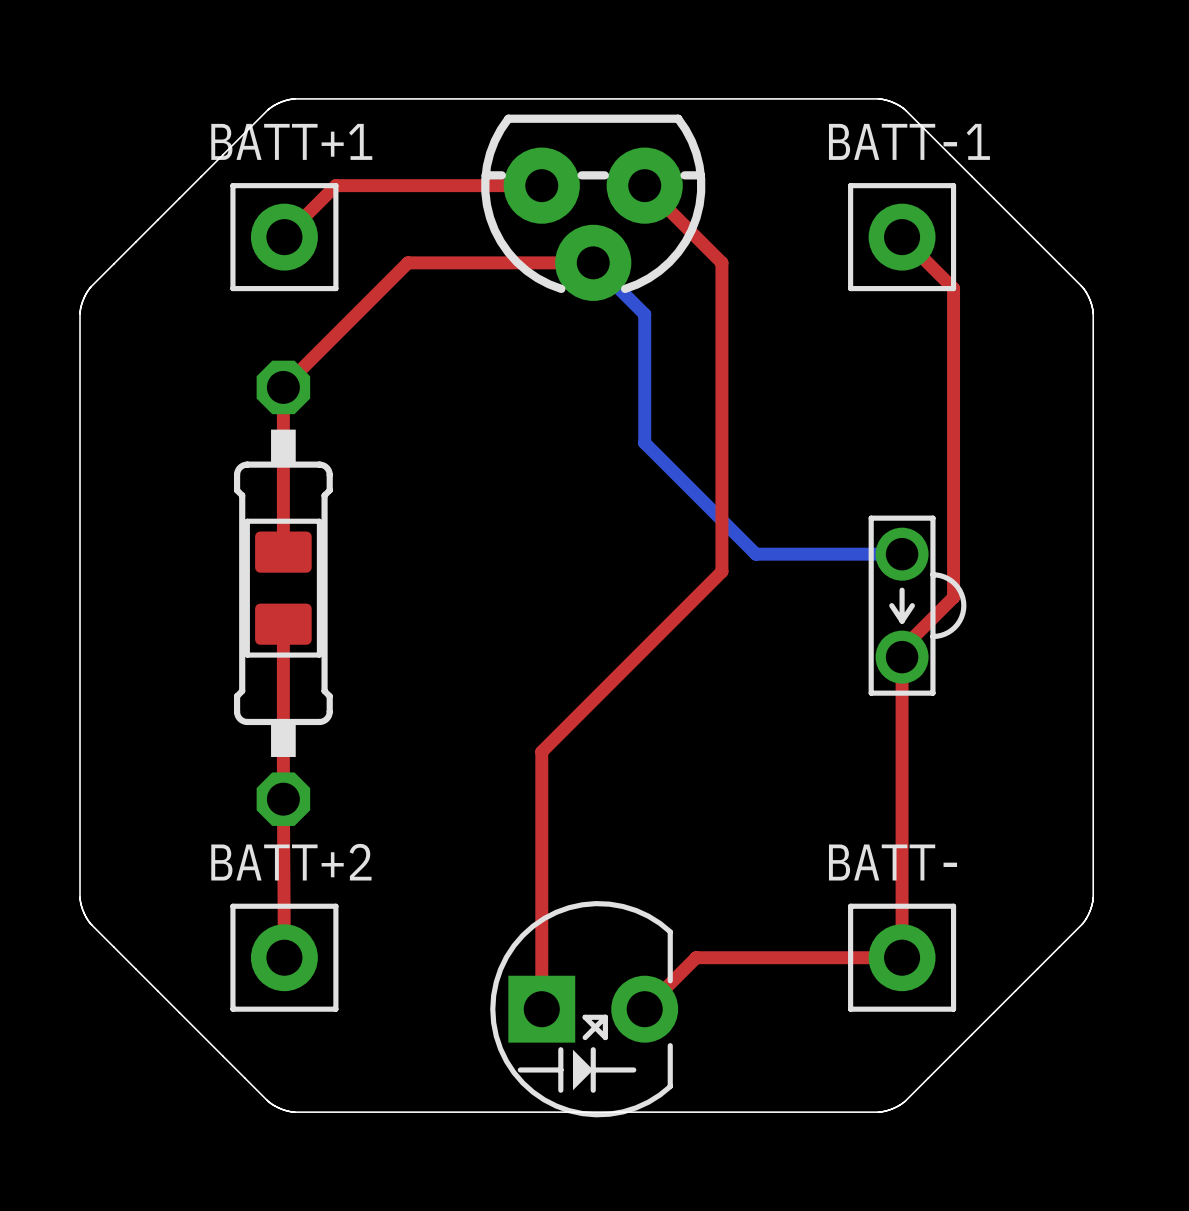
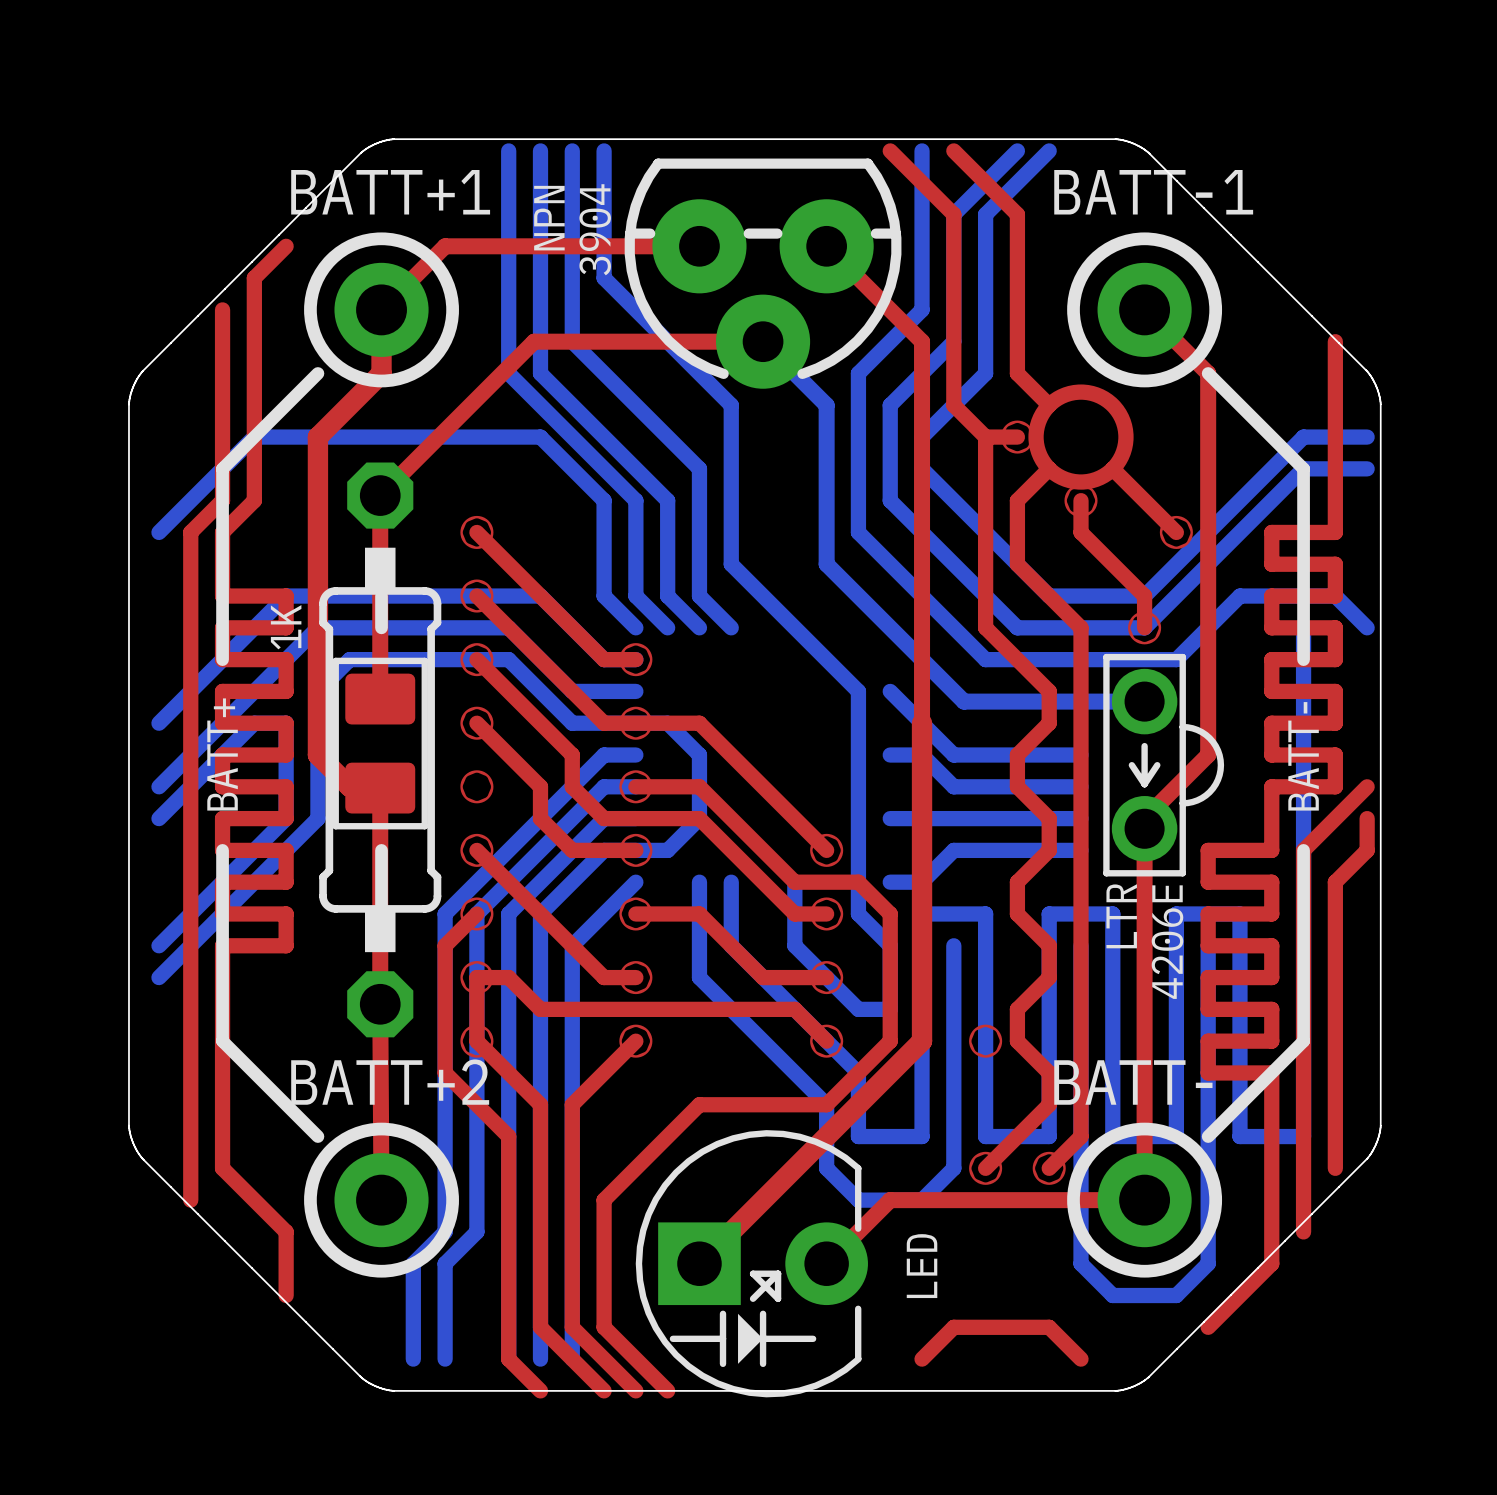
bottom track: none -> (508, 150) (508, 373) (635, 500) (635, 596) (667, 627)
bottom track: none -> (540, 150) (540, 373) (667, 500) (667, 596) (699, 627)
bottom track: none -> (572, 150) (572, 341) (699, 468) (699, 596) (731, 627)
bottom track: none -> (604, 150) (604, 278) (731, 405) (731, 564) (858, 691) (858, 913) (890, 945) (890, 1009) (858, 1009) (794, 945) (794, 882)
top track: none -> (890, 150) (953, 214) (953, 405) (985, 437)
bottom track: none -> (922, 150) (922, 309) (858, 373) (858, 532) (985, 659) (1176, 659) (1239, 596) (1335, 596) (1367, 627)
top track: none -> (953, 150) (1017, 214) (1017, 373) (1049, 405)
bottom track: none -> (1017, 150) (953, 214) (953, 341) (890, 405) (890, 500) (1017, 627) (1144, 627) (1303, 468) (1367, 468)
bottom track: none -> (1049, 150) (985, 214) (985, 373) (922, 437) (922, 468) (1049, 596) (1144, 596) (1303, 437) (1367, 437)
text: none -> NPN (549, 218)
text: none -> 3904 (595, 229)
drawing: none -> [304, 232, 459, 388]
drawing: none -> [1000, 232, 1223, 549]
BATT+1 footprint: [230, 183, 339, 292] -> [334, 262, 429, 357]
BATT-1 footprint: [848, 183, 957, 292] -> [1097, 262, 1192, 357]
top track: none -> (286, 246) (254, 278) (254, 500) (222, 532) (222, 596) (286, 596) (286, 627) (222, 627) (222, 659) (286, 659) (286, 691) (222, 691) (222, 723) (286, 723) (286, 755) (222, 755) (222, 786) (286, 786) (286, 818) (222, 818) (222, 850) (286, 850) (286, 882) (222, 882) (222, 913) (286, 913) (286, 945) (222, 945) (222, 1168) (286, 1231) (286, 1295)
top track: none -> (222, 309) (222, 500) (190, 532) (190, 1200)
top track: none -> (381, 309) (381, 373) (317, 437) (317, 755) (349, 786) (380, 788)
top track: none -> (1335, 341) (1335, 532) (1271, 532) (1271, 564) (1335, 564) (1335, 596) (1271, 596) (1271, 627) (1335, 627) (1335, 659) (1271, 659) (1271, 691) (1335, 691) (1335, 723) (1271, 723) (1271, 755) (1335, 755) (1335, 786) (1271, 786) (1271, 850) (1208, 850) (1208, 882) (1271, 882) (1271, 913) (1208, 913) (1208, 945) (1271, 945) (1271, 977) (1208, 977) (1208, 1009) (1271, 1009) (1271, 1041) (1208, 1041) (1208, 1072) (1271, 1072) (1271, 1263) (1208, 1327)
line: none -> (317, 373) (222, 468) (222, 659)
line: none -> (1208, 373) (1303, 468) (1303, 659)
top track: none -> (985, 437) (1017, 437)
top track: none -> (985, 437) (985, 627) (1049, 691) (1049, 723) (1017, 755) (1017, 786) (1049, 818) (1049, 850) (1017, 882) (1017, 913) (1049, 945) (1049, 977) (1017, 1009) (1017, 1041) (1049, 1072) (1049, 1104) (985, 1168)
top track: none -> (1049, 468) (1017, 500) (1017, 564) (1081, 627) (1081, 1136) (1049, 1168)
top track: none -> (1112, 468) (1176, 532)
top track: none -> (1081, 500) (1081, 532) (1144, 596) (1144, 627)
drawing: none -> [460, 515, 494, 1058]
bottom track: none -> (158, 532) (254, 437) (540, 437) (604, 500) (604, 596) (635, 627)
top track: none -> (476, 532) (604, 659) (635, 659)
line: none -> (381, 596) (381, 627)
top track: none -> (476, 596) (604, 723) (699, 723) (826, 850)
drawing: none -> [1128, 611, 1162, 645]
text: none -> 1K (286, 627)
bottom track: none -> (1303, 627) (1303, 1136) (1239, 1136) (1239, 913) (1176, 913) (1176, 1136) (1112, 1136) (1112, 913) (1049, 913) (1049, 1136) (985, 1136) (985, 913) (922, 913) (922, 1136) (858, 1136) (858, 1072) (731, 945) (731, 882)
drawing: none -> [619, 643, 653, 1058]
top track: none -> (476, 659) (572, 755) (572, 786) (604, 818) (699, 818) (794, 913) (826, 913)
bottom track: none -> (635, 659) (604, 659) (540, 596) (286, 596) (158, 723)
bottom track: none -> (635, 691) (572, 691) (508, 627) (317, 627) (158, 786)
bottom track: none -> (890, 691) (953, 755) (1081, 755)
top track: none -> (476, 723) (540, 786) (540, 818) (572, 850) (635, 850)
top track: (721, 571) (541, 751) (541, 1009) -> (922, 723) (922, 1041) (699, 1263)
text: none -> BATT+ (222, 754)
bottom track: none -> (635, 755) (604, 755) (445, 913) (445, 1231) (413, 1263) (413, 1359)
bottom track: none -> (890, 755) (922, 755) (953, 786) (1081, 786)
text: none -> BATT- (1303, 756)
top track: none -> (635, 786) (699, 786) (794, 882) (858, 882) (890, 913) (890, 1041) (826, 1104) (699, 1104) (604, 1200) (604, 1327) (667, 1390)
bottom track: none -> (635, 786) (604, 786) (476, 913) (476, 1231) (445, 1263) (445, 1359)
top track: none -> (1367, 786) (1303, 850) (1303, 1231)
bottom track: none -> (158, 818) (254, 723) (286, 723) (286, 818) (158, 945)
bottom track: none -> (635, 818) (604, 818) (508, 913) (508, 1359)
bottom track: none -> (890, 818) (1081, 818)
top track: none -> (1367, 818) (1367, 850) (1335, 882) (1335, 1168)
drawing: none -> [810, 833, 844, 1058]
line: none -> (222, 850) (222, 1041) (317, 1136)
line: none -> (381, 850) (381, 913)
top track: none -> (476, 850) (604, 977) (635, 977)
bottom track: none -> (1081, 850) (953, 850) (922, 882) (890, 882)
line: none -> (1303, 850) (1303, 1041) (1208, 1136)
bottom track: none -> (635, 882) (572, 945) (572, 1359)
bottom track: none -> (699, 882) (699, 977) (826, 1104) (826, 1168) (858, 1200) (922, 1200) (953, 1168) (953, 945)
top track: none -> (476, 913) (445, 945) (445, 1072) (508, 1136) (508, 1359) (540, 1390)
top track: none -> (635, 913) (699, 913) (763, 977) (826, 977)
text: none -> LTR (1121, 916)
text: none -> 4206E (1167, 942)
bottom track: none -> (1081, 945) (1081, 1263) (1112, 1295) (1176, 1295) (1208, 1263) (1208, 945)
bottom track: none -> (158, 977) (317, 818) (317, 691) (349, 659) (508, 659) (572, 723) (667, 723) (699, 755) (699, 818) (667, 850) (604, 850) (540, 913) (540, 1359)
drawing: none -> [969, 1024, 1003, 1058]
top track: none -> (635, 1041) (572, 1104) (572, 1327) (635, 1390)
top track: none -> (826, 1041) (794, 1009) (540, 1009) (508, 977) (476, 977) (476, 1041) (540, 1104) (540, 1327) (604, 1390)
drawing: none -> [304, 1122, 459, 1278]
drawing: none -> [969, 1122, 1223, 1278]
BATT+2 footprint: [230, 903, 339, 1012] -> [334, 1153, 429, 1248]
BATT- footprint: [848, 903, 957, 1012] -> [1097, 1153, 1192, 1248]
text: none -> LED (922, 1266)
top track: none -> (922, 1359) (953, 1327) (1049, 1327) (1081, 1359)

